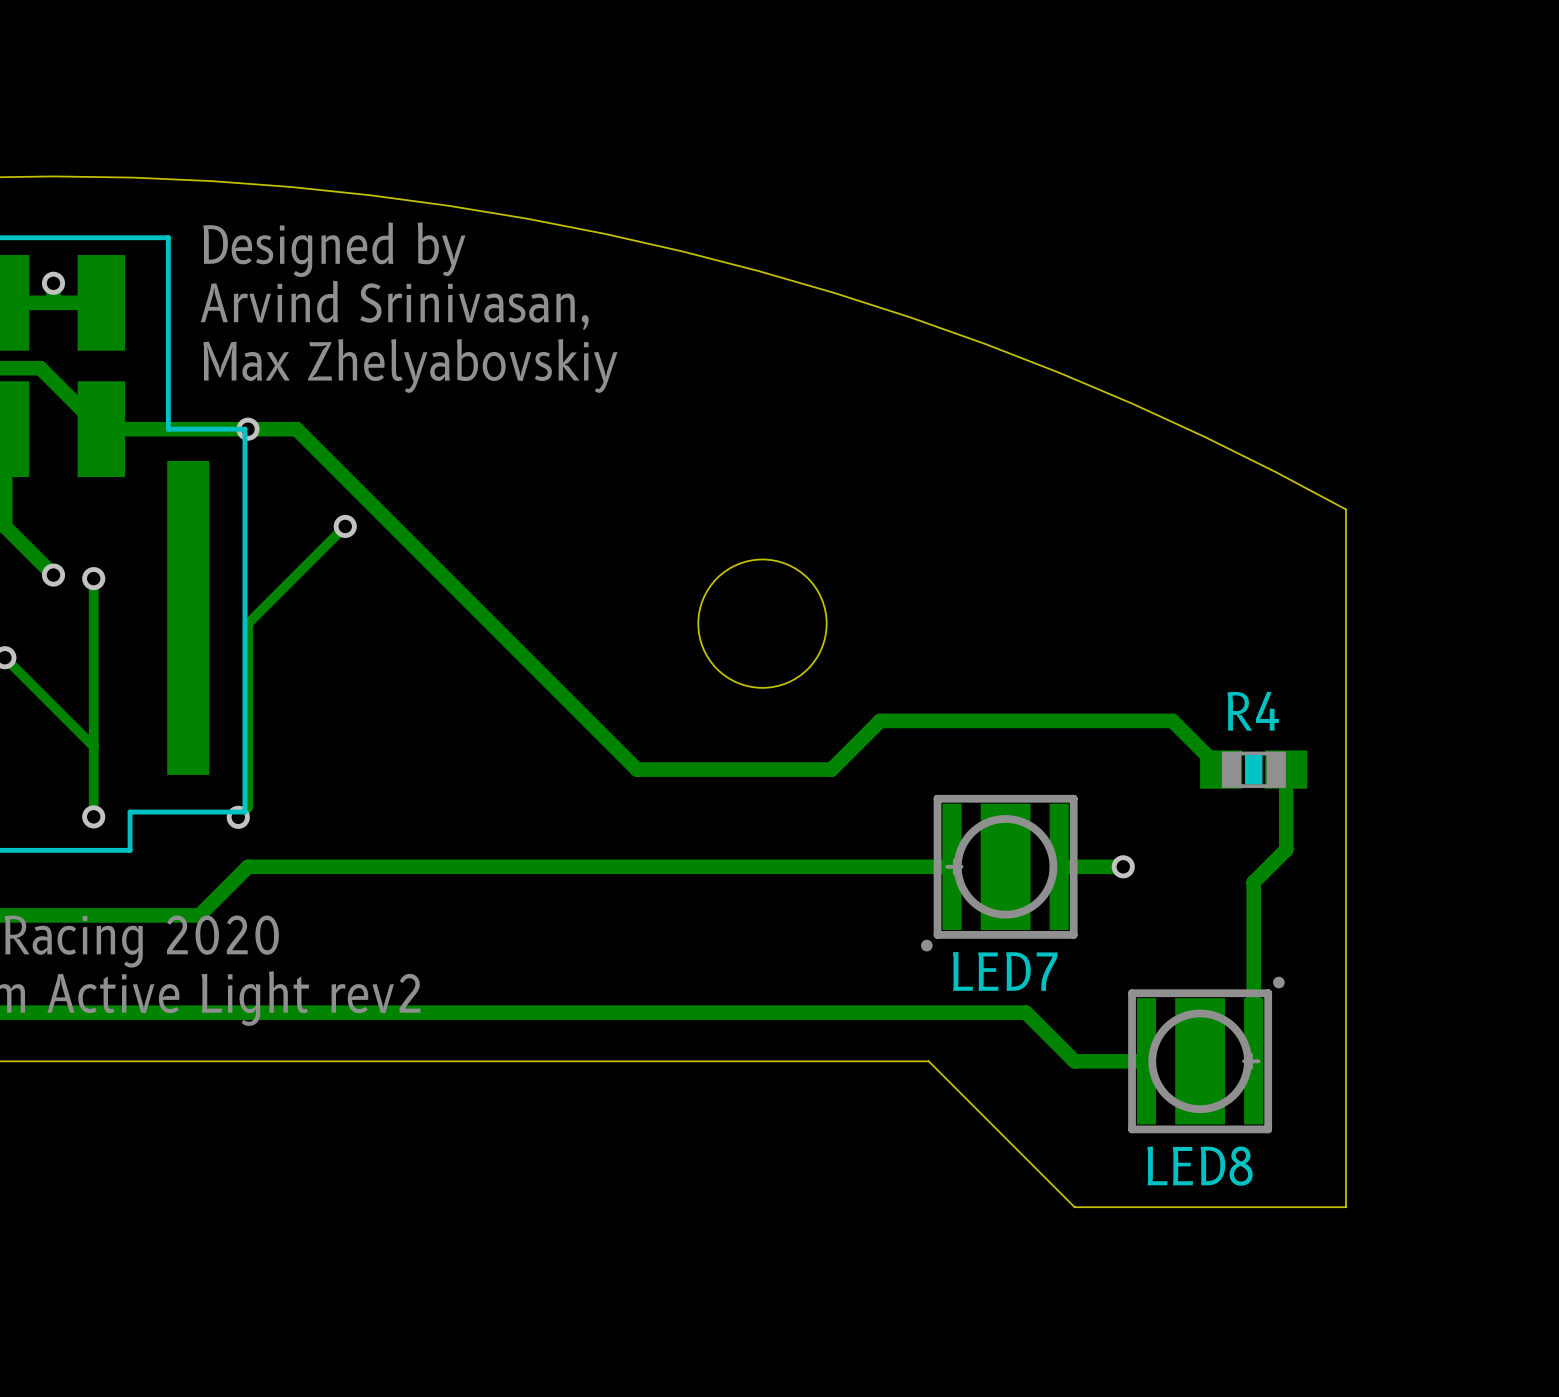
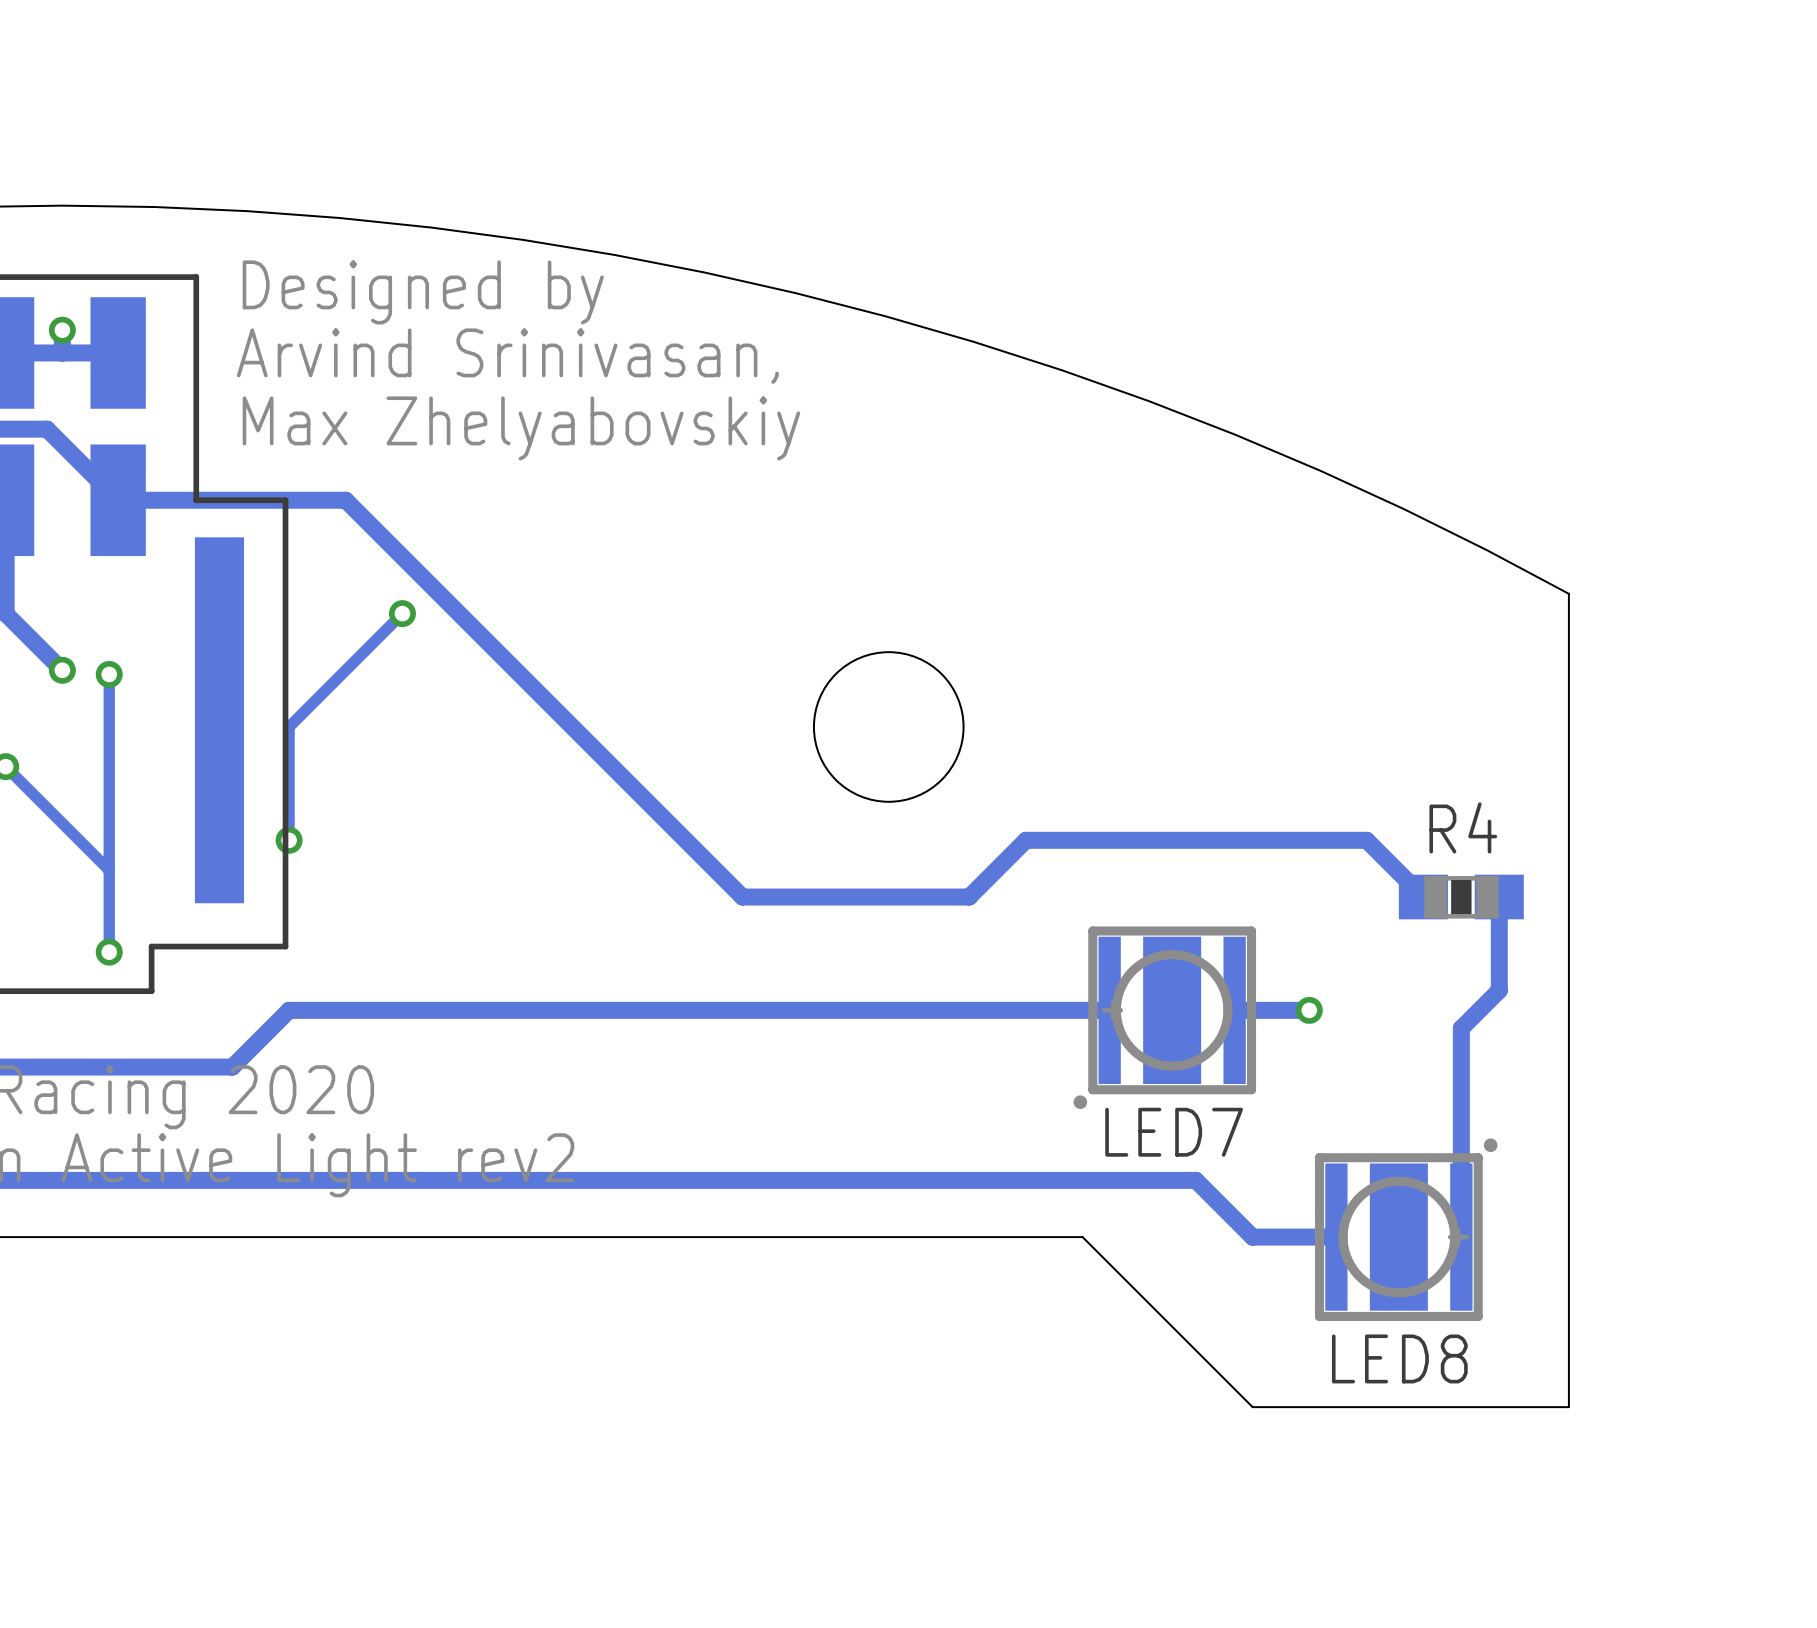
via: (248, 429) -> none
track: (248, 720) (248, 807) (238, 817) -> none
via position: (238, 817) -> (289, 840)

